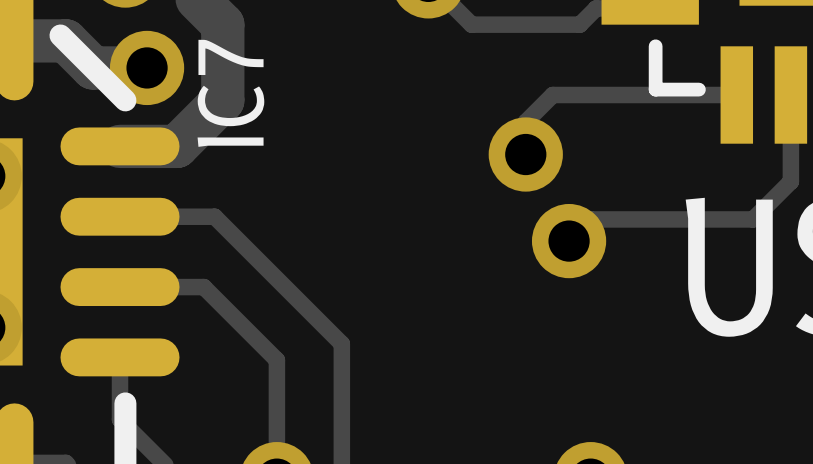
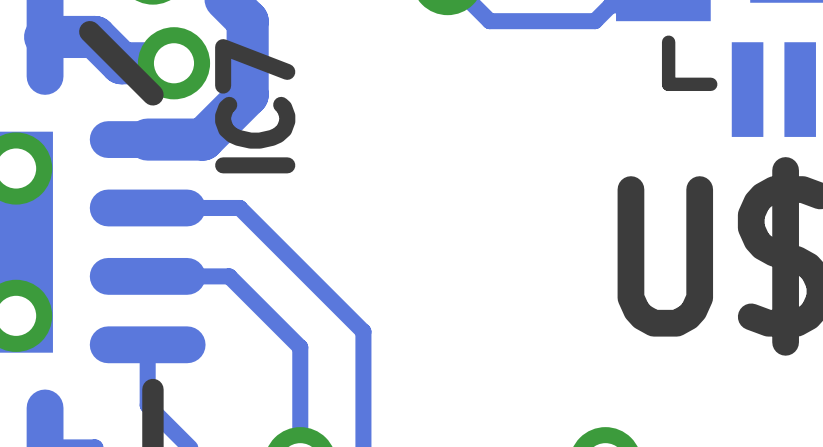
track: (736, 95) (552, 95) (525, 122) (525, 154) -> none
track: (790, 95) (790, 181) (753, 219) (590, 219) (569, 241) -> none
via: (525, 154) -> none
via: (569, 241) -> none

